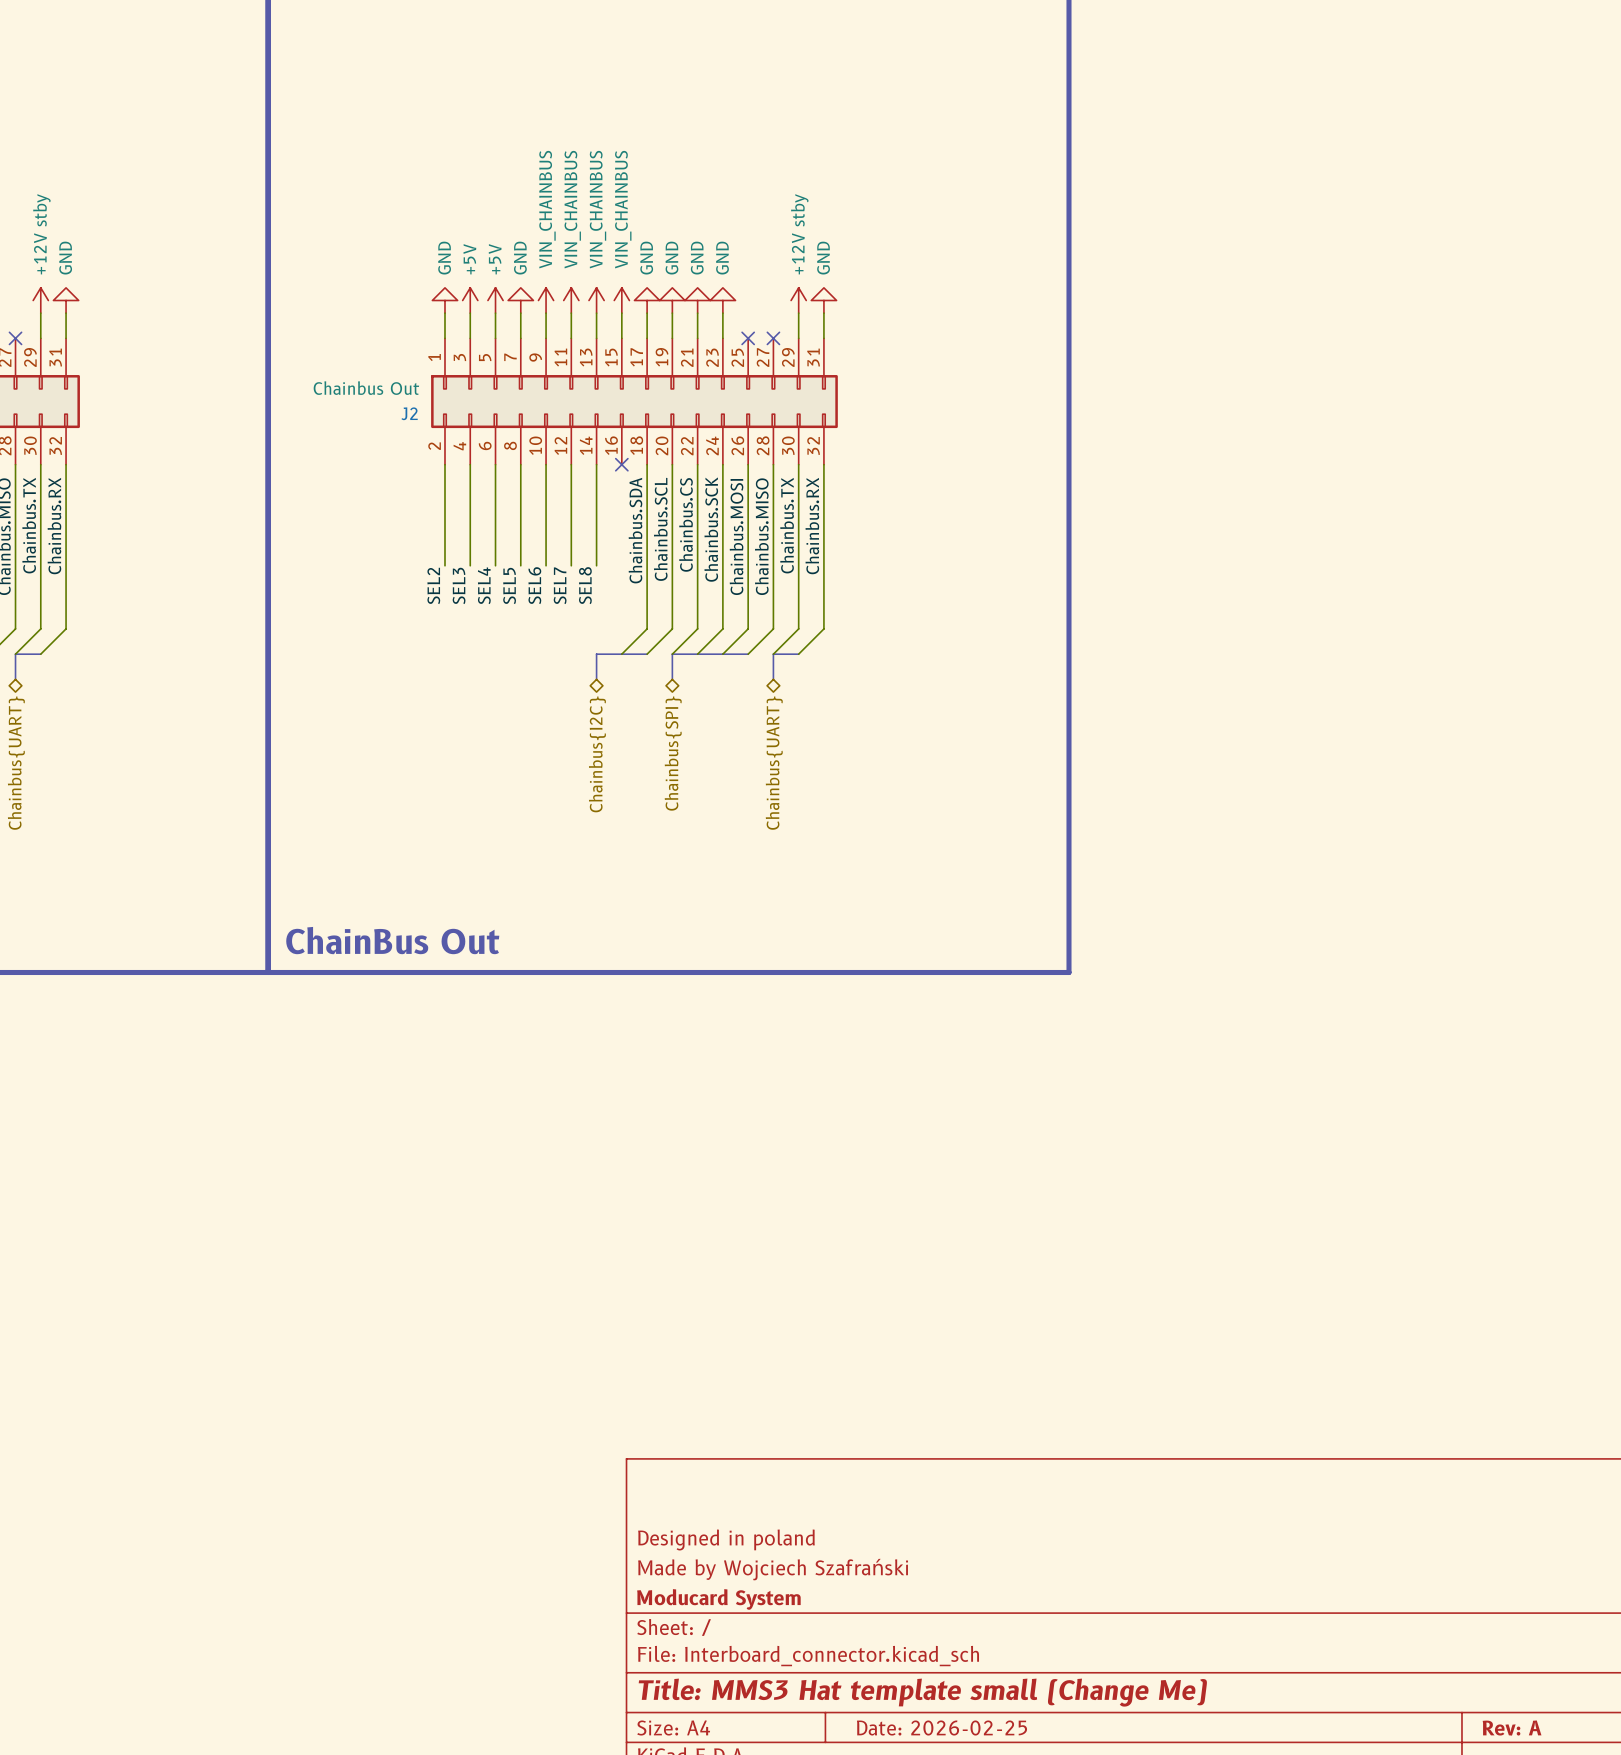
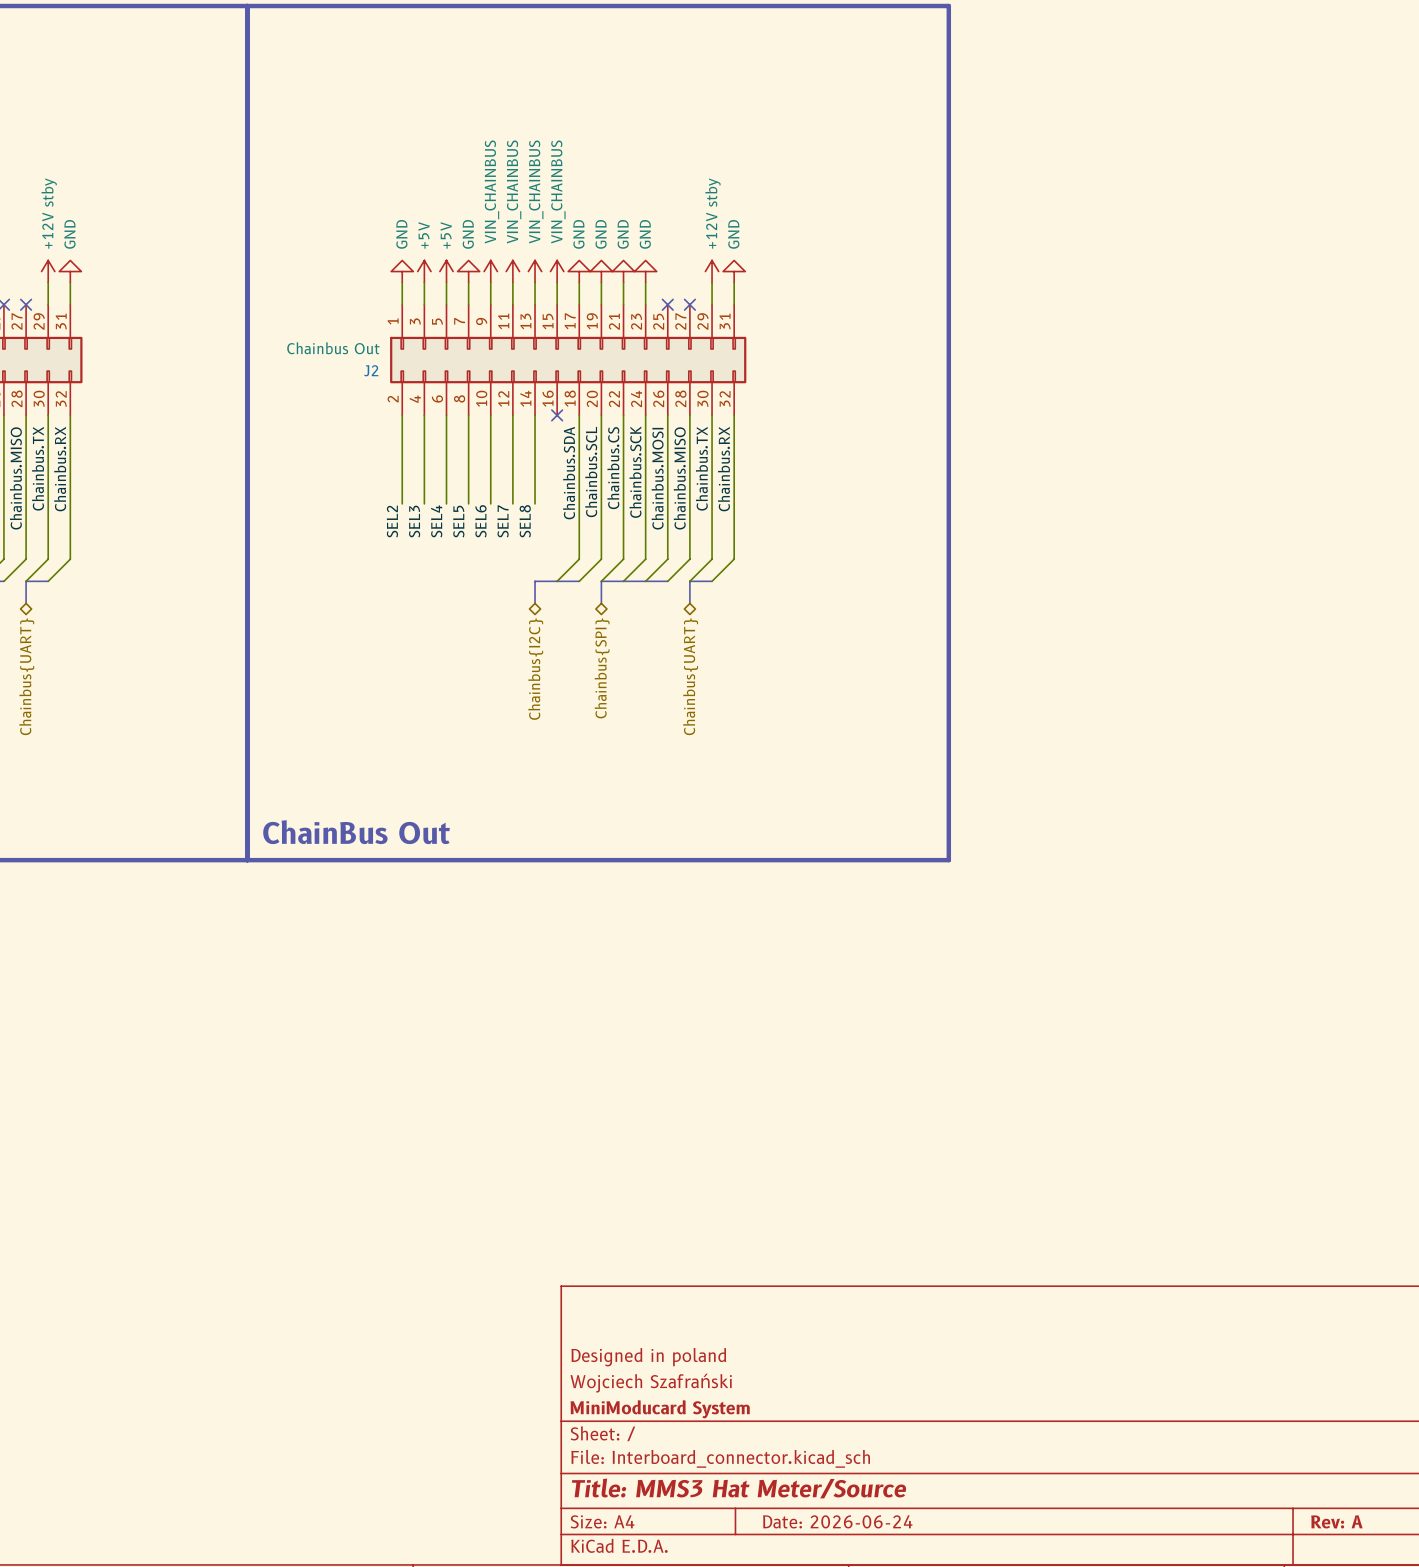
title block: Made by Wojciech Szafrański (773, 1569) -> Wojciech Szafrański (651, 1383)
title block: Moducard System (718, 1599) -> MiniModucard System (660, 1409)
title block: Title: MMS3 Hat template small (Change Me) (922, 1692) -> Title: MMS3 Hat Meter/Source (739, 1488)
title block: Date: 2026-02-25 (941, 1728) -> Date: 2026-06-24 (837, 1521)

